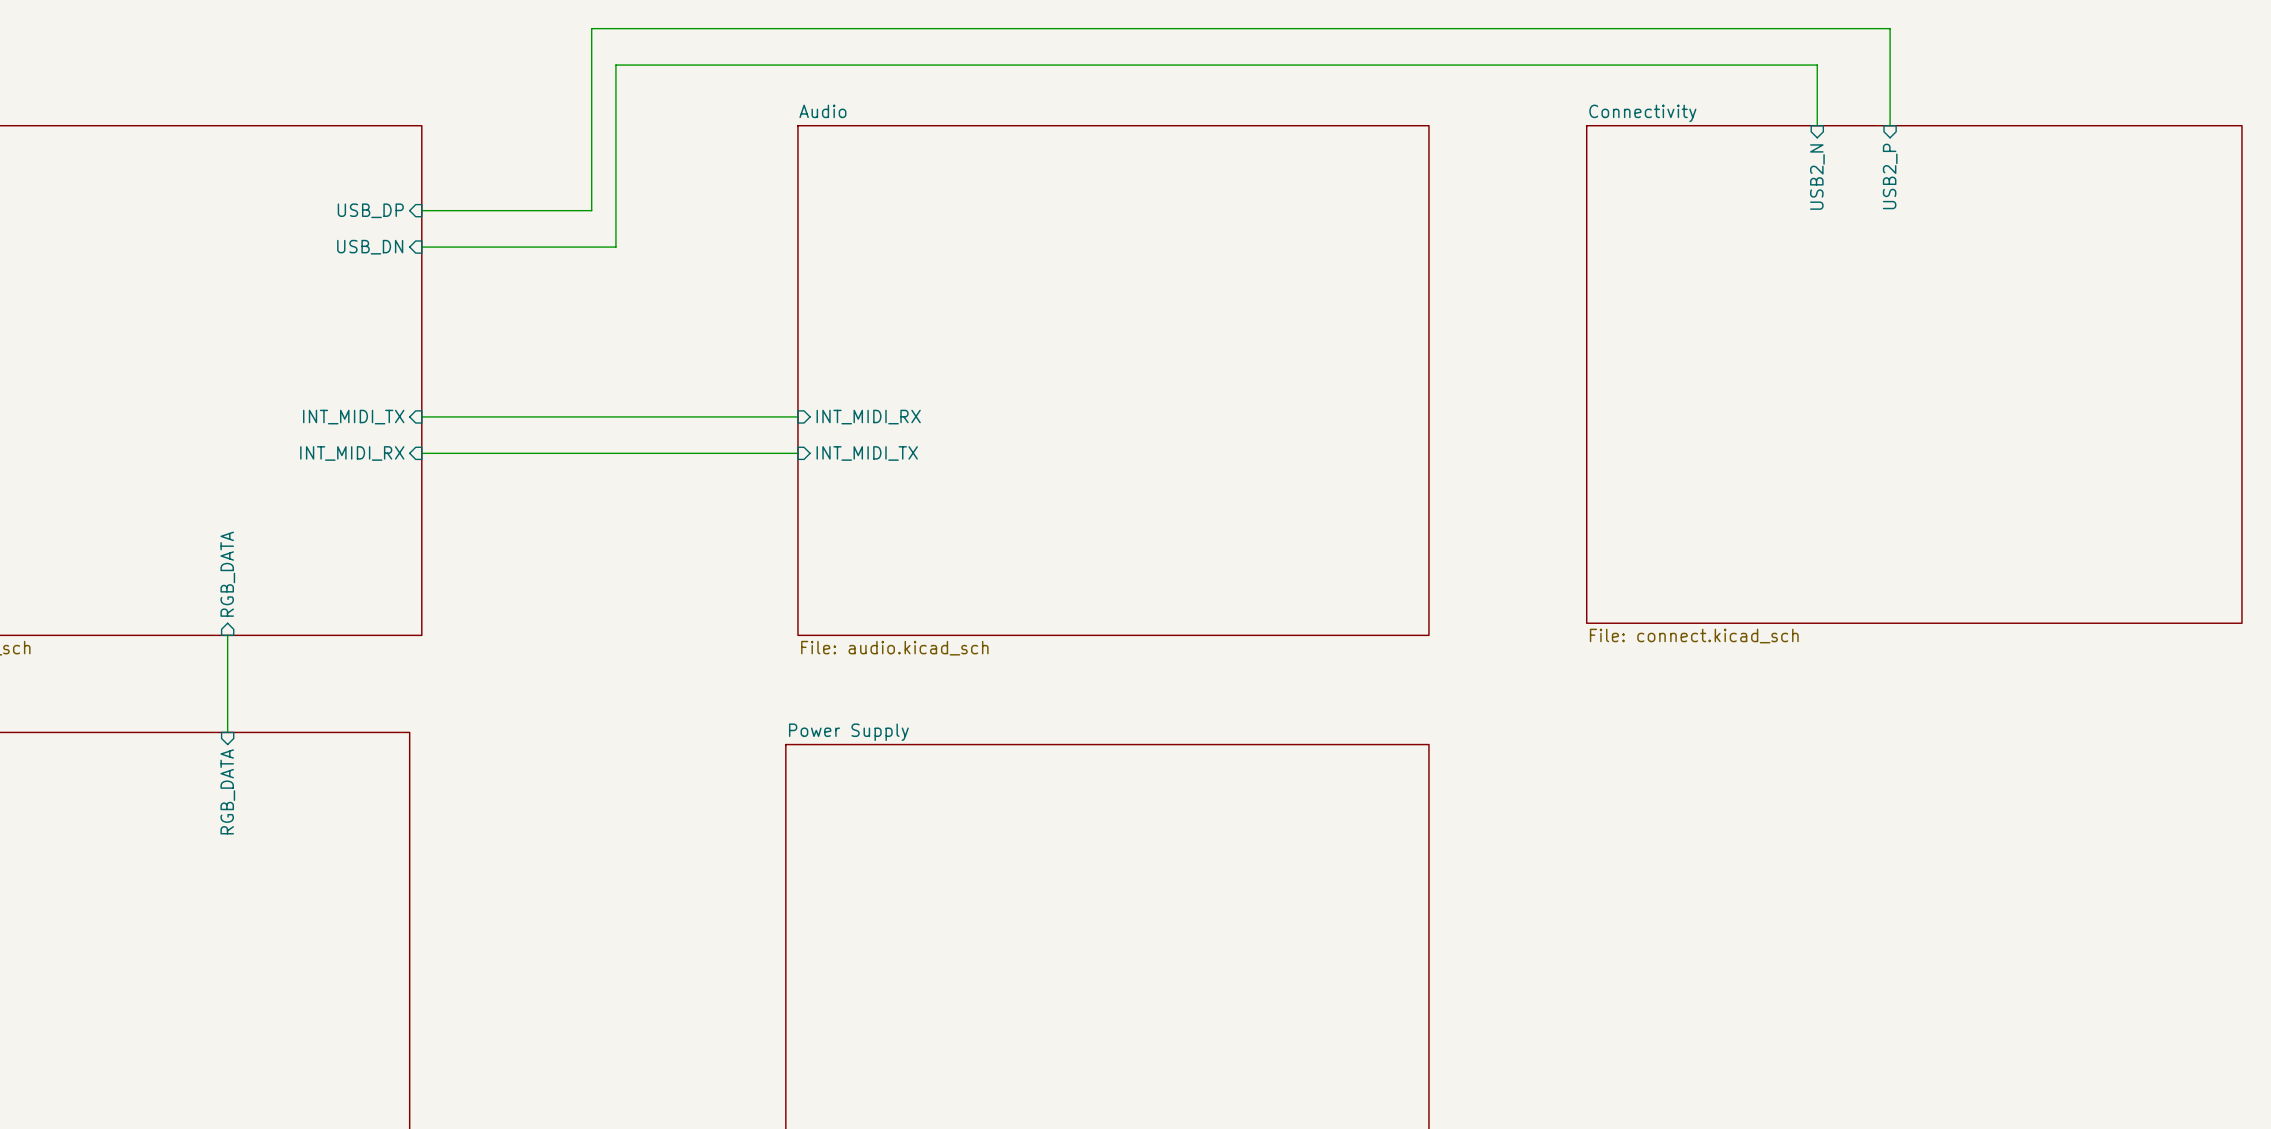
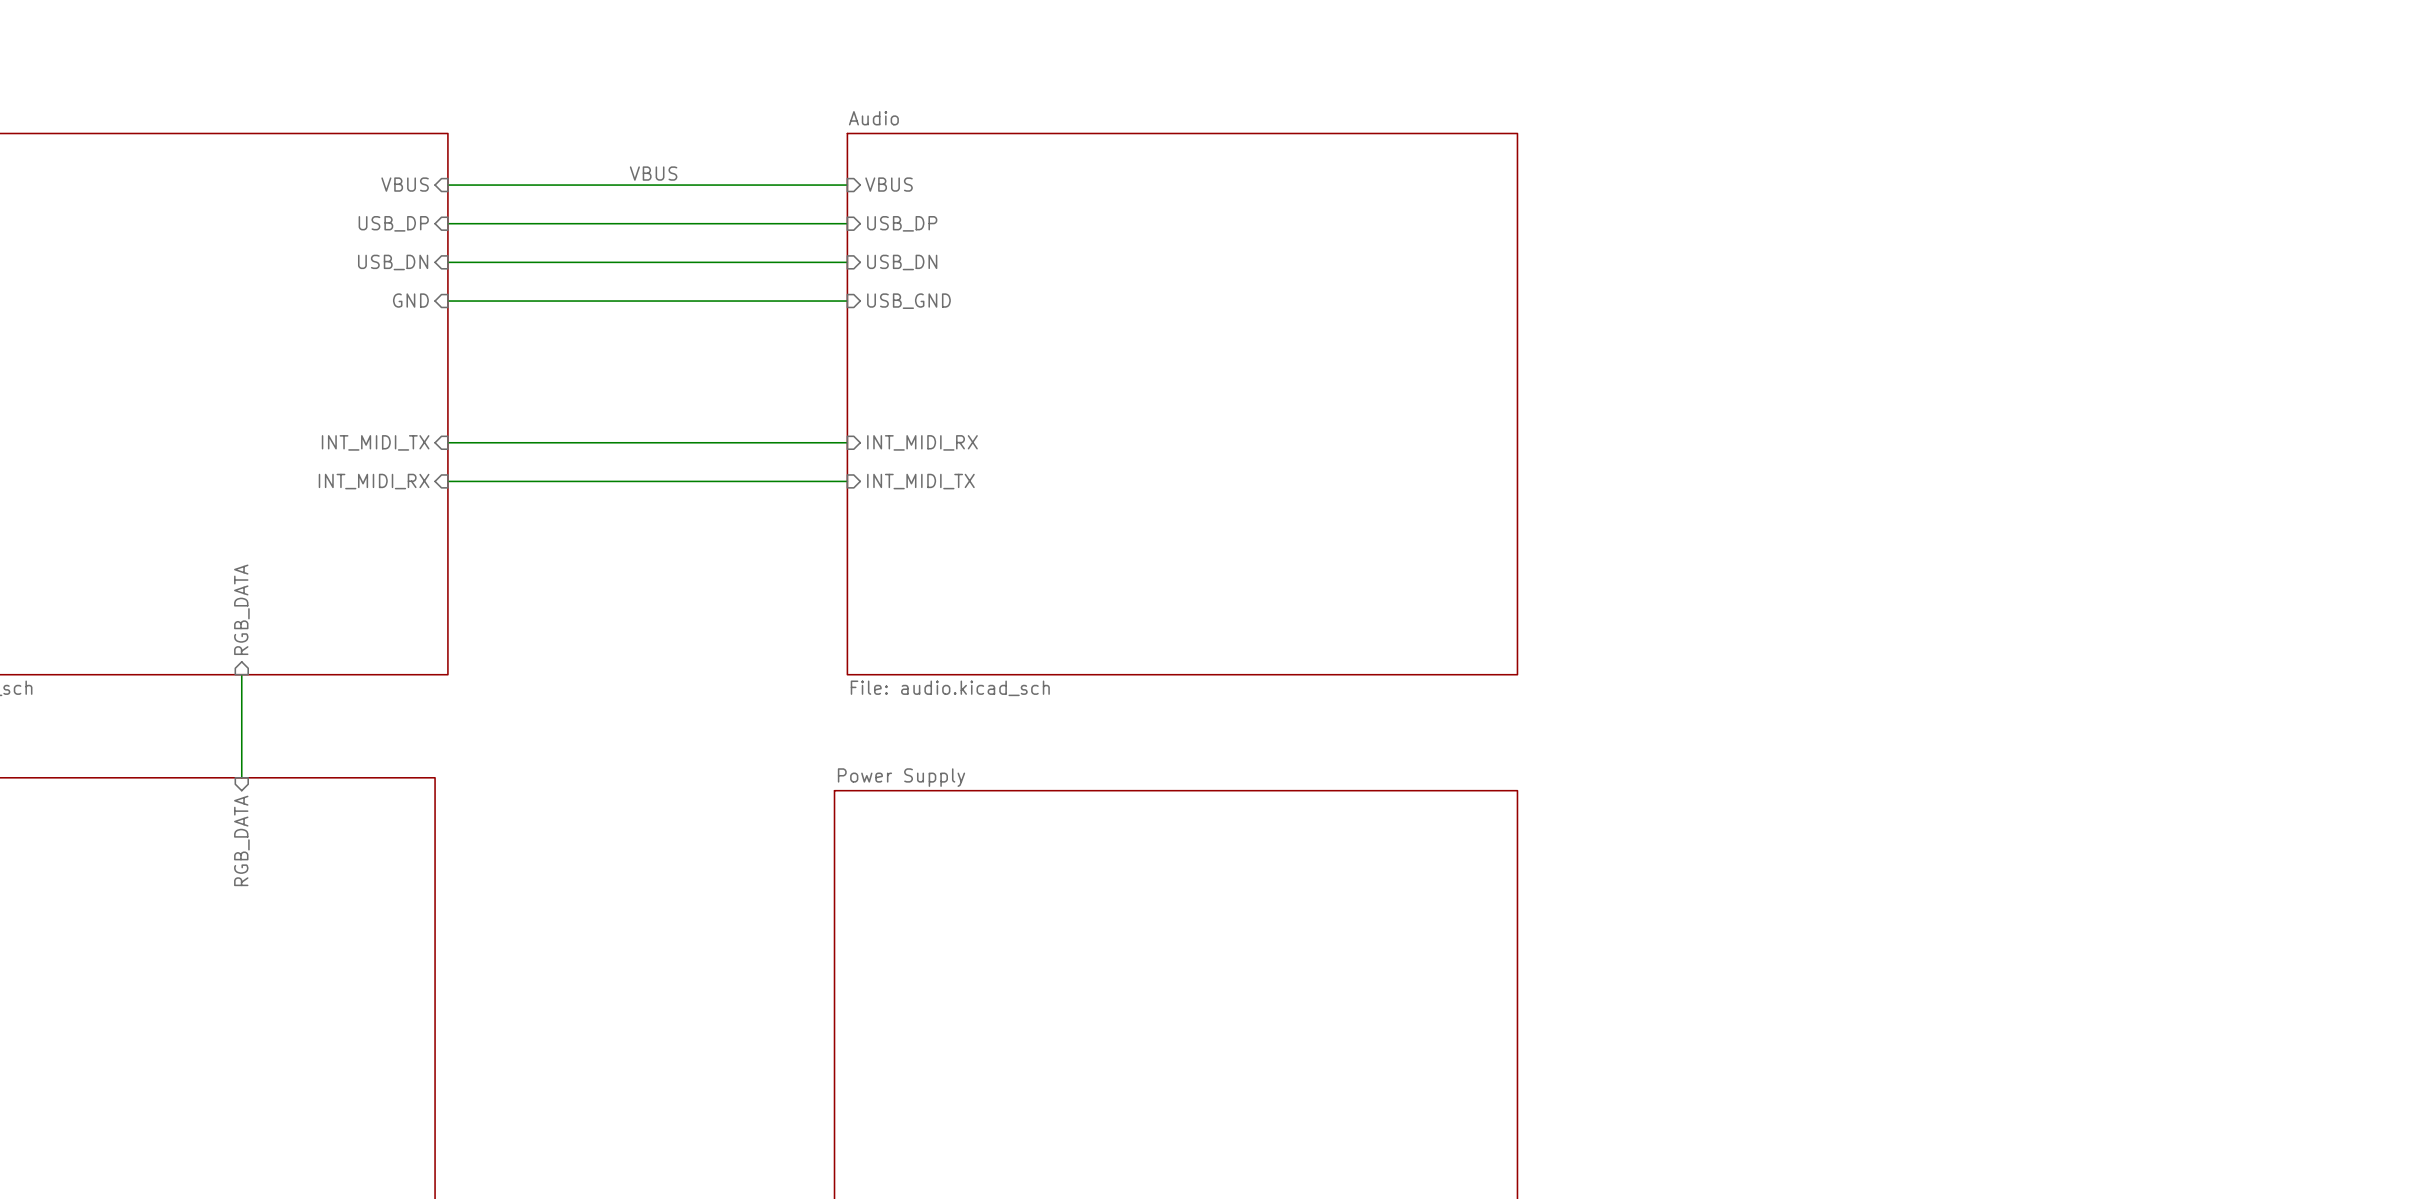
wire: (1817, 125) (1817, 65) (615, 65) (615, 247) -> (847, 262) (654, 262)
wire: (1890, 125) (1890, 28) (591, 28) (591, 210) -> (847, 223) (628, 223)
label: none -> VBUS (653, 173)
sheet pin: none -> VBUS (405, 184)
sheet pin: none -> VBUS (889, 184)
wire: none -> (447, 185) (847, 185)
sheet pin: USB2_P (1890, 176) -> none
sheet pin: USB2_N (1817, 177) -> none
sheet pin: none -> USB_DP (902, 223)
sheet pin: none -> USB_DN (902, 262)
sheet pin: none -> GND (410, 300)
wire: none -> (447, 301) (847, 301)
sheet pin: none -> USB_GND (908, 301)
sheet Connectivity: File: connect.kicad_sch (1914, 374) -> none

